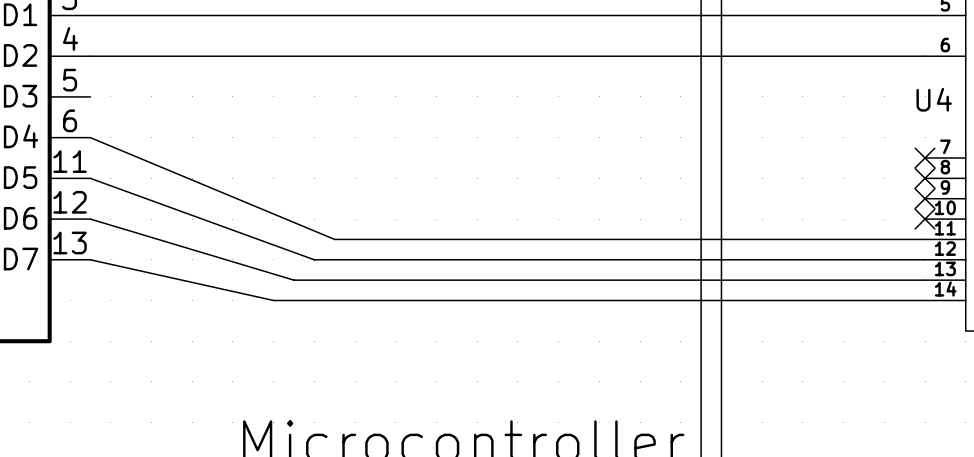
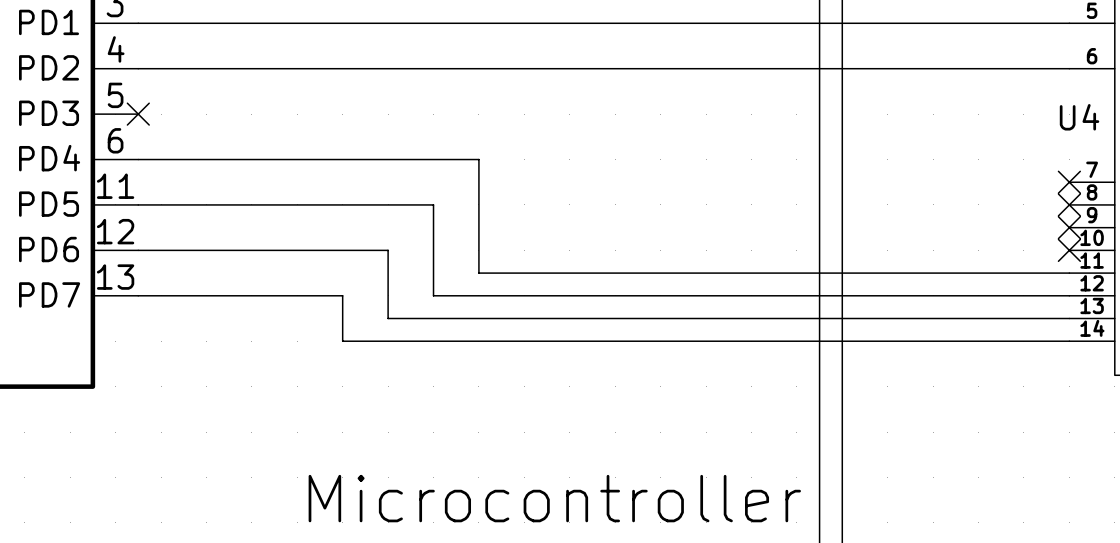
no-connect mark: none -> (138, 114)
wire: (90, 137) (334, 239) (395, 239) -> (138, 159) (478, 159) (478, 273)
wire: (90, 178) (314, 259) (355, 259) -> (138, 204) (433, 204) (433, 295)
wire: (90, 219) (293, 280) (314, 280) -> (138, 250) (388, 250) (388, 318)
wire: (90, 259) (273, 300) -> (138, 295) (342, 295) (342, 341)

